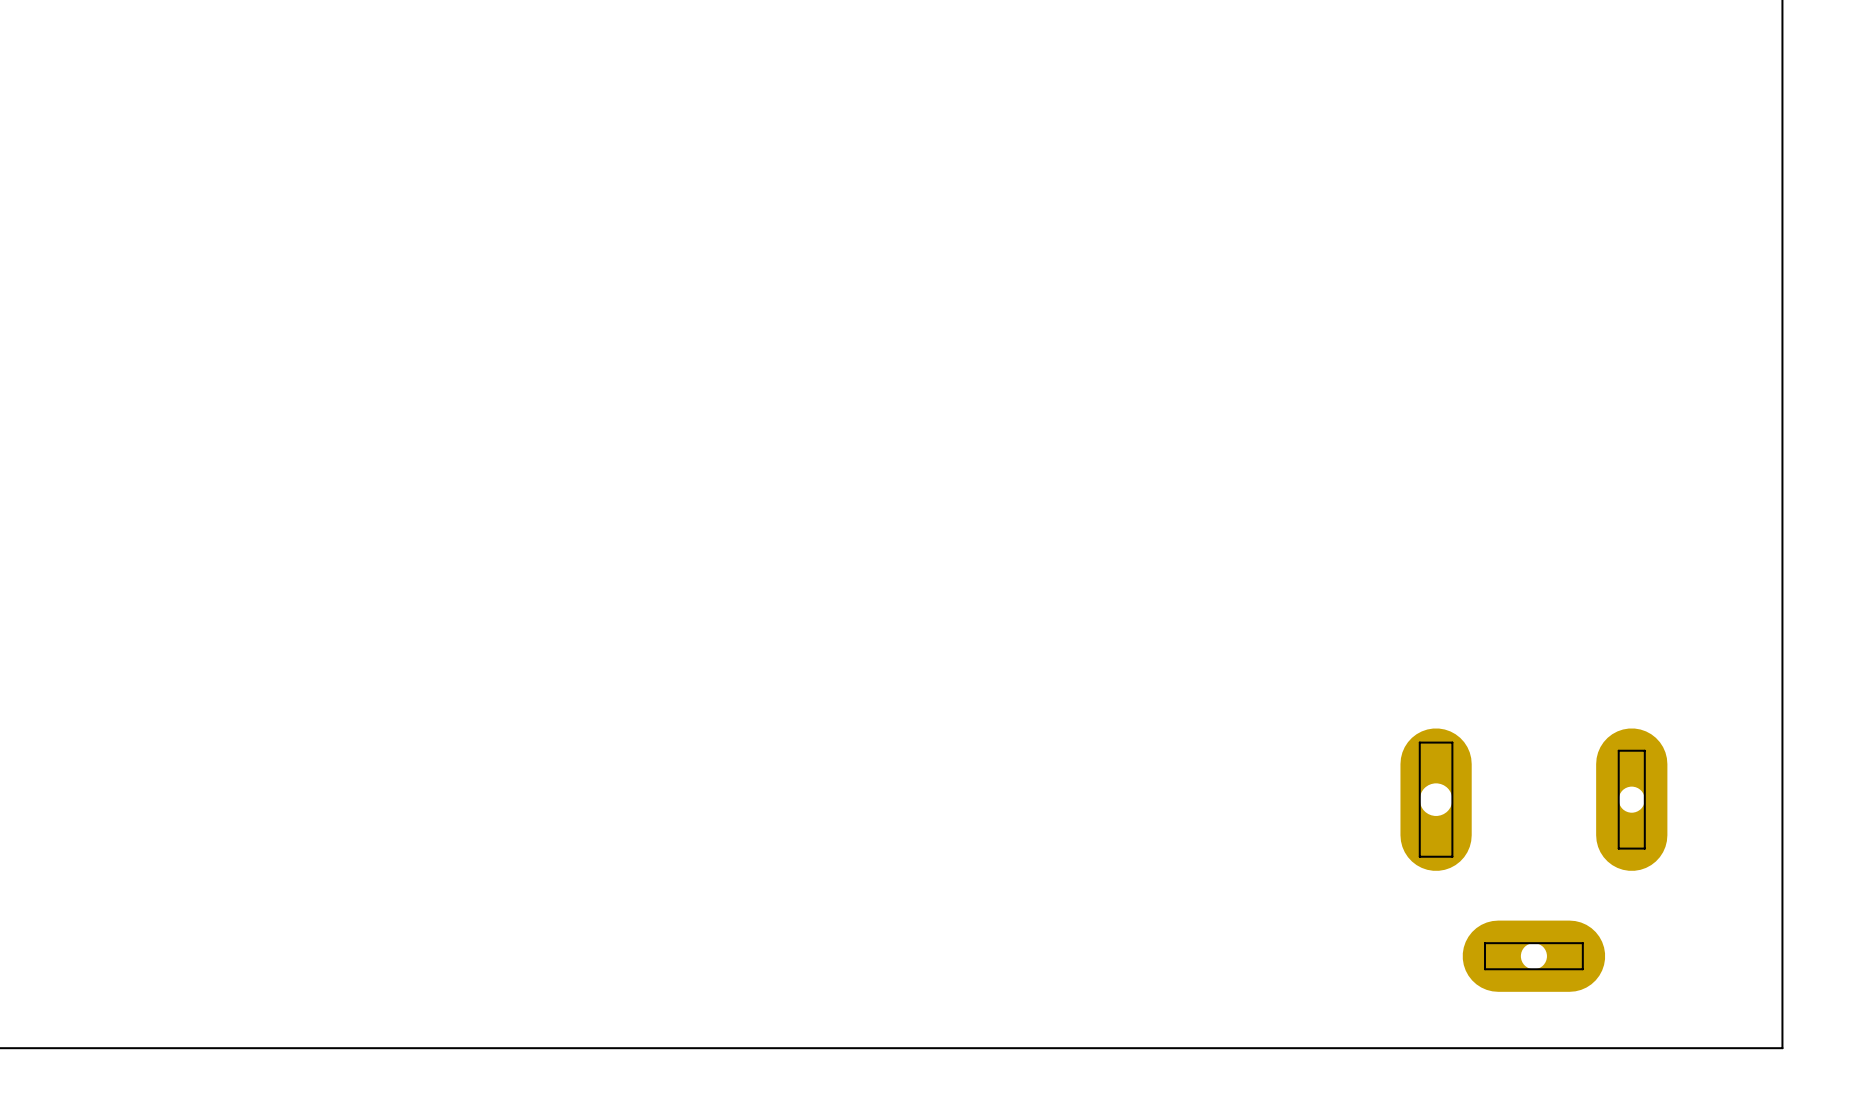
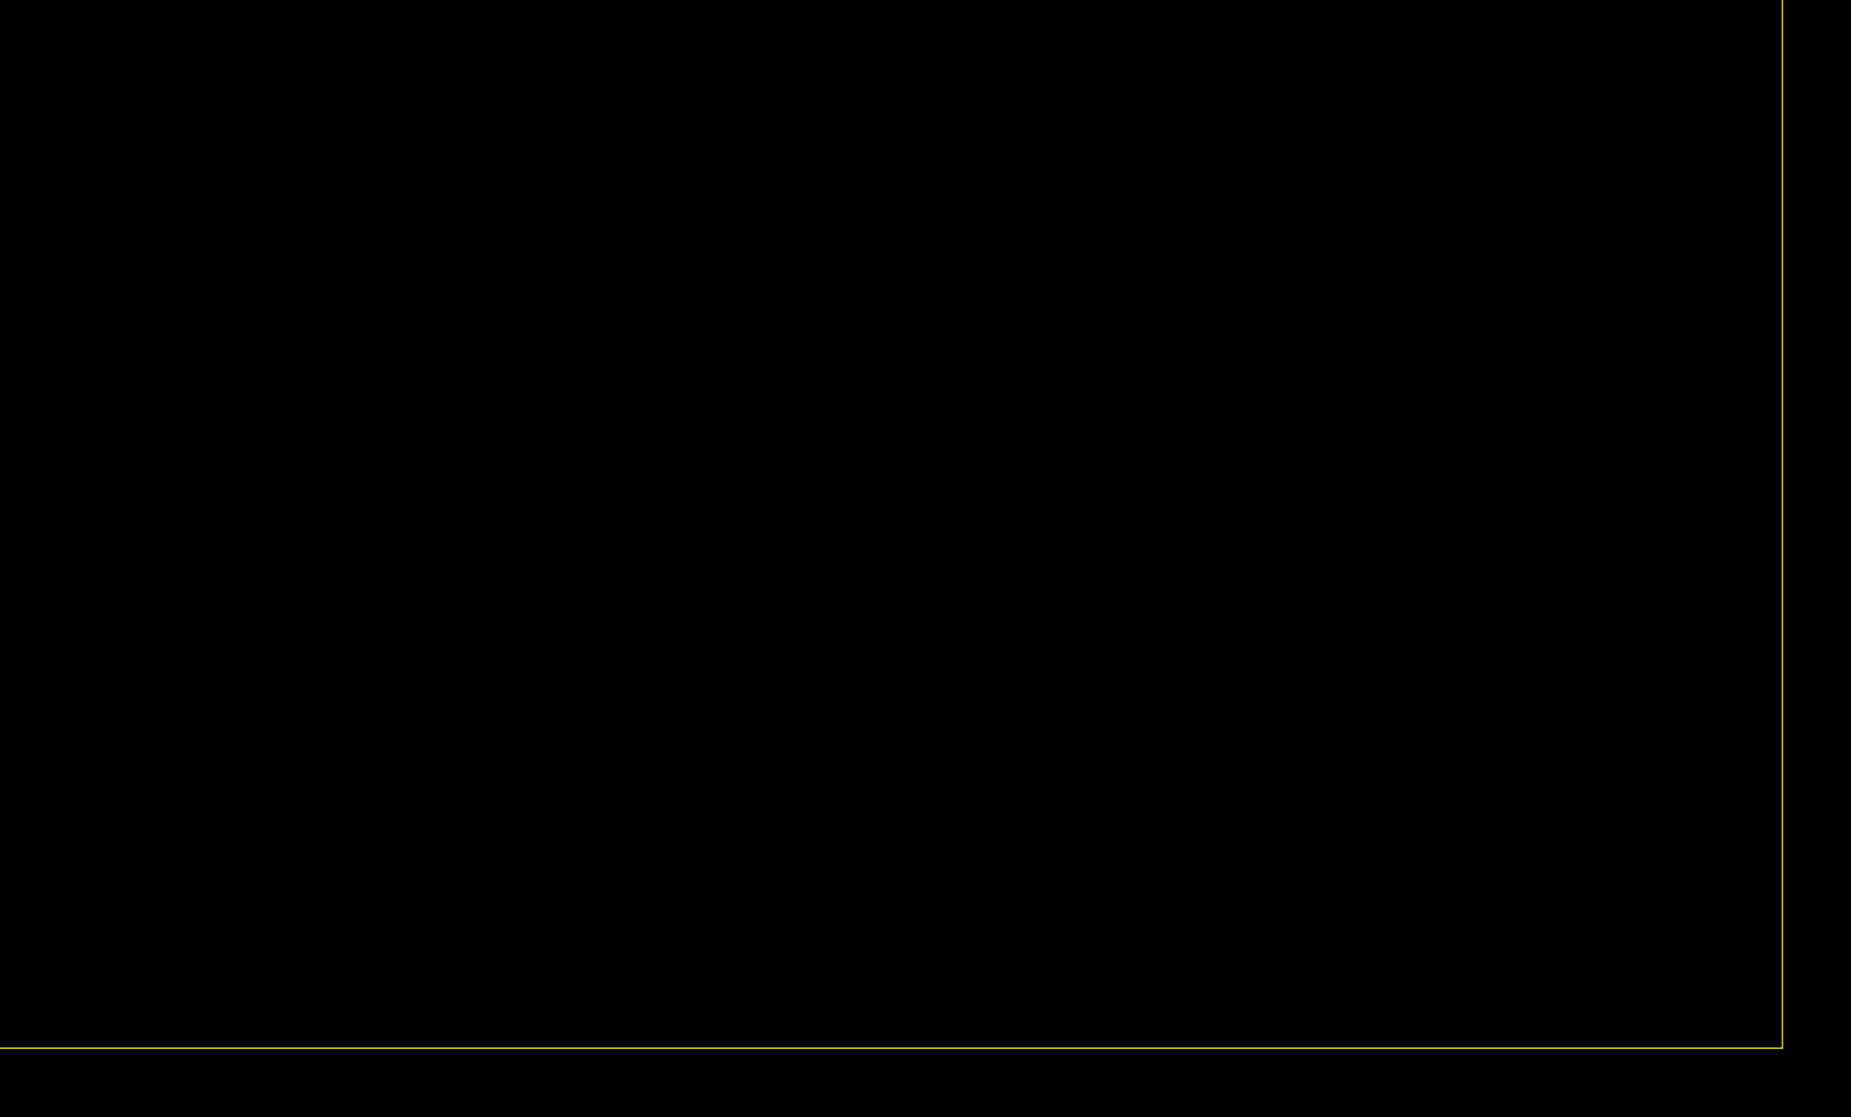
part: (1533, 860) -> none

